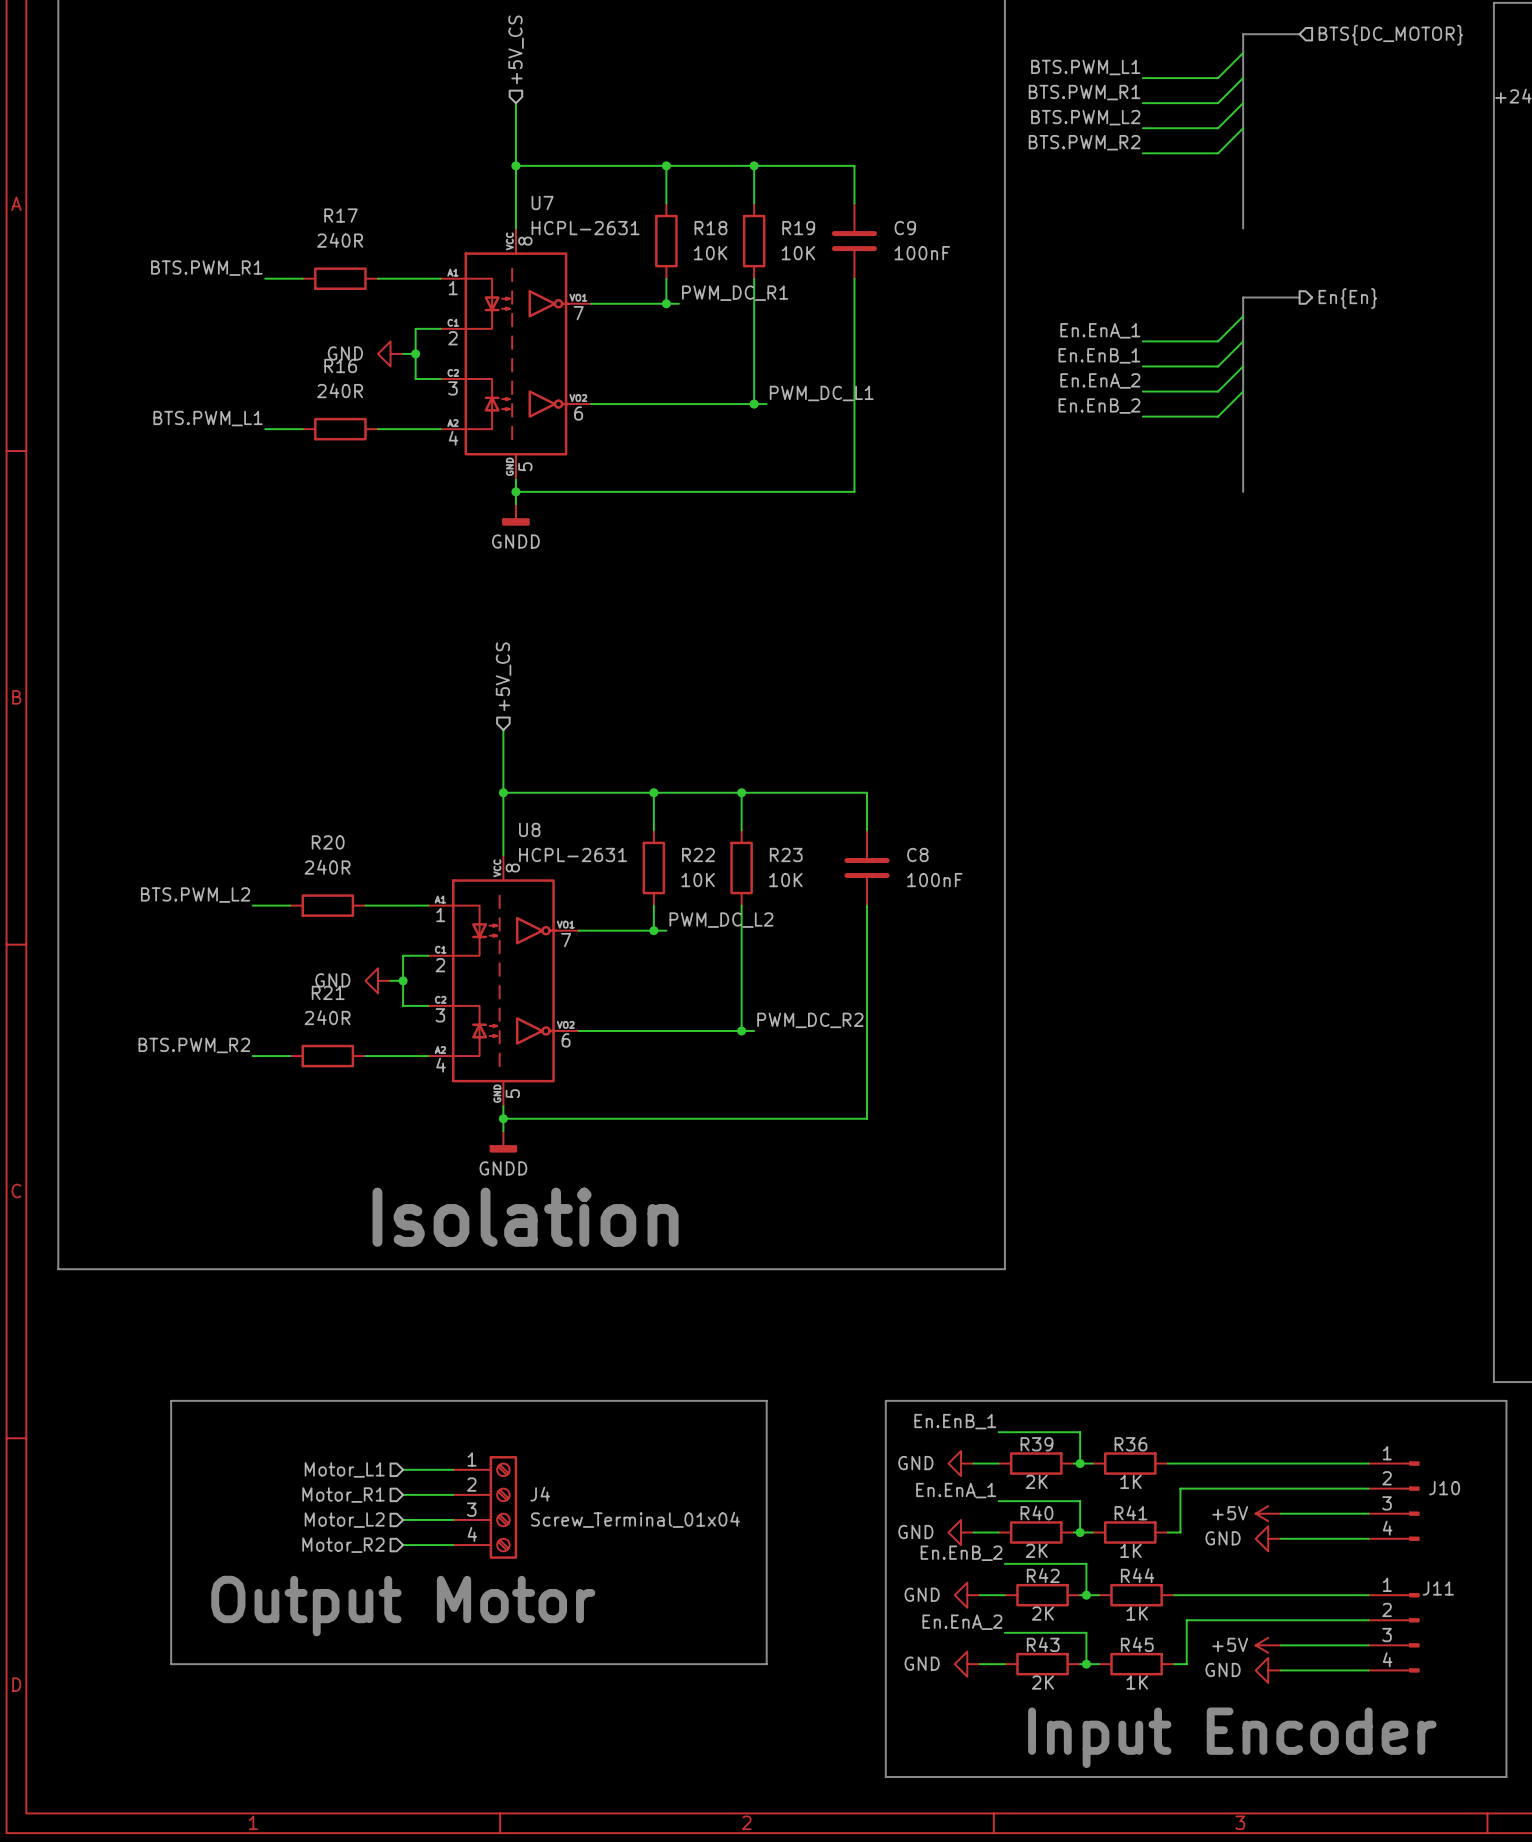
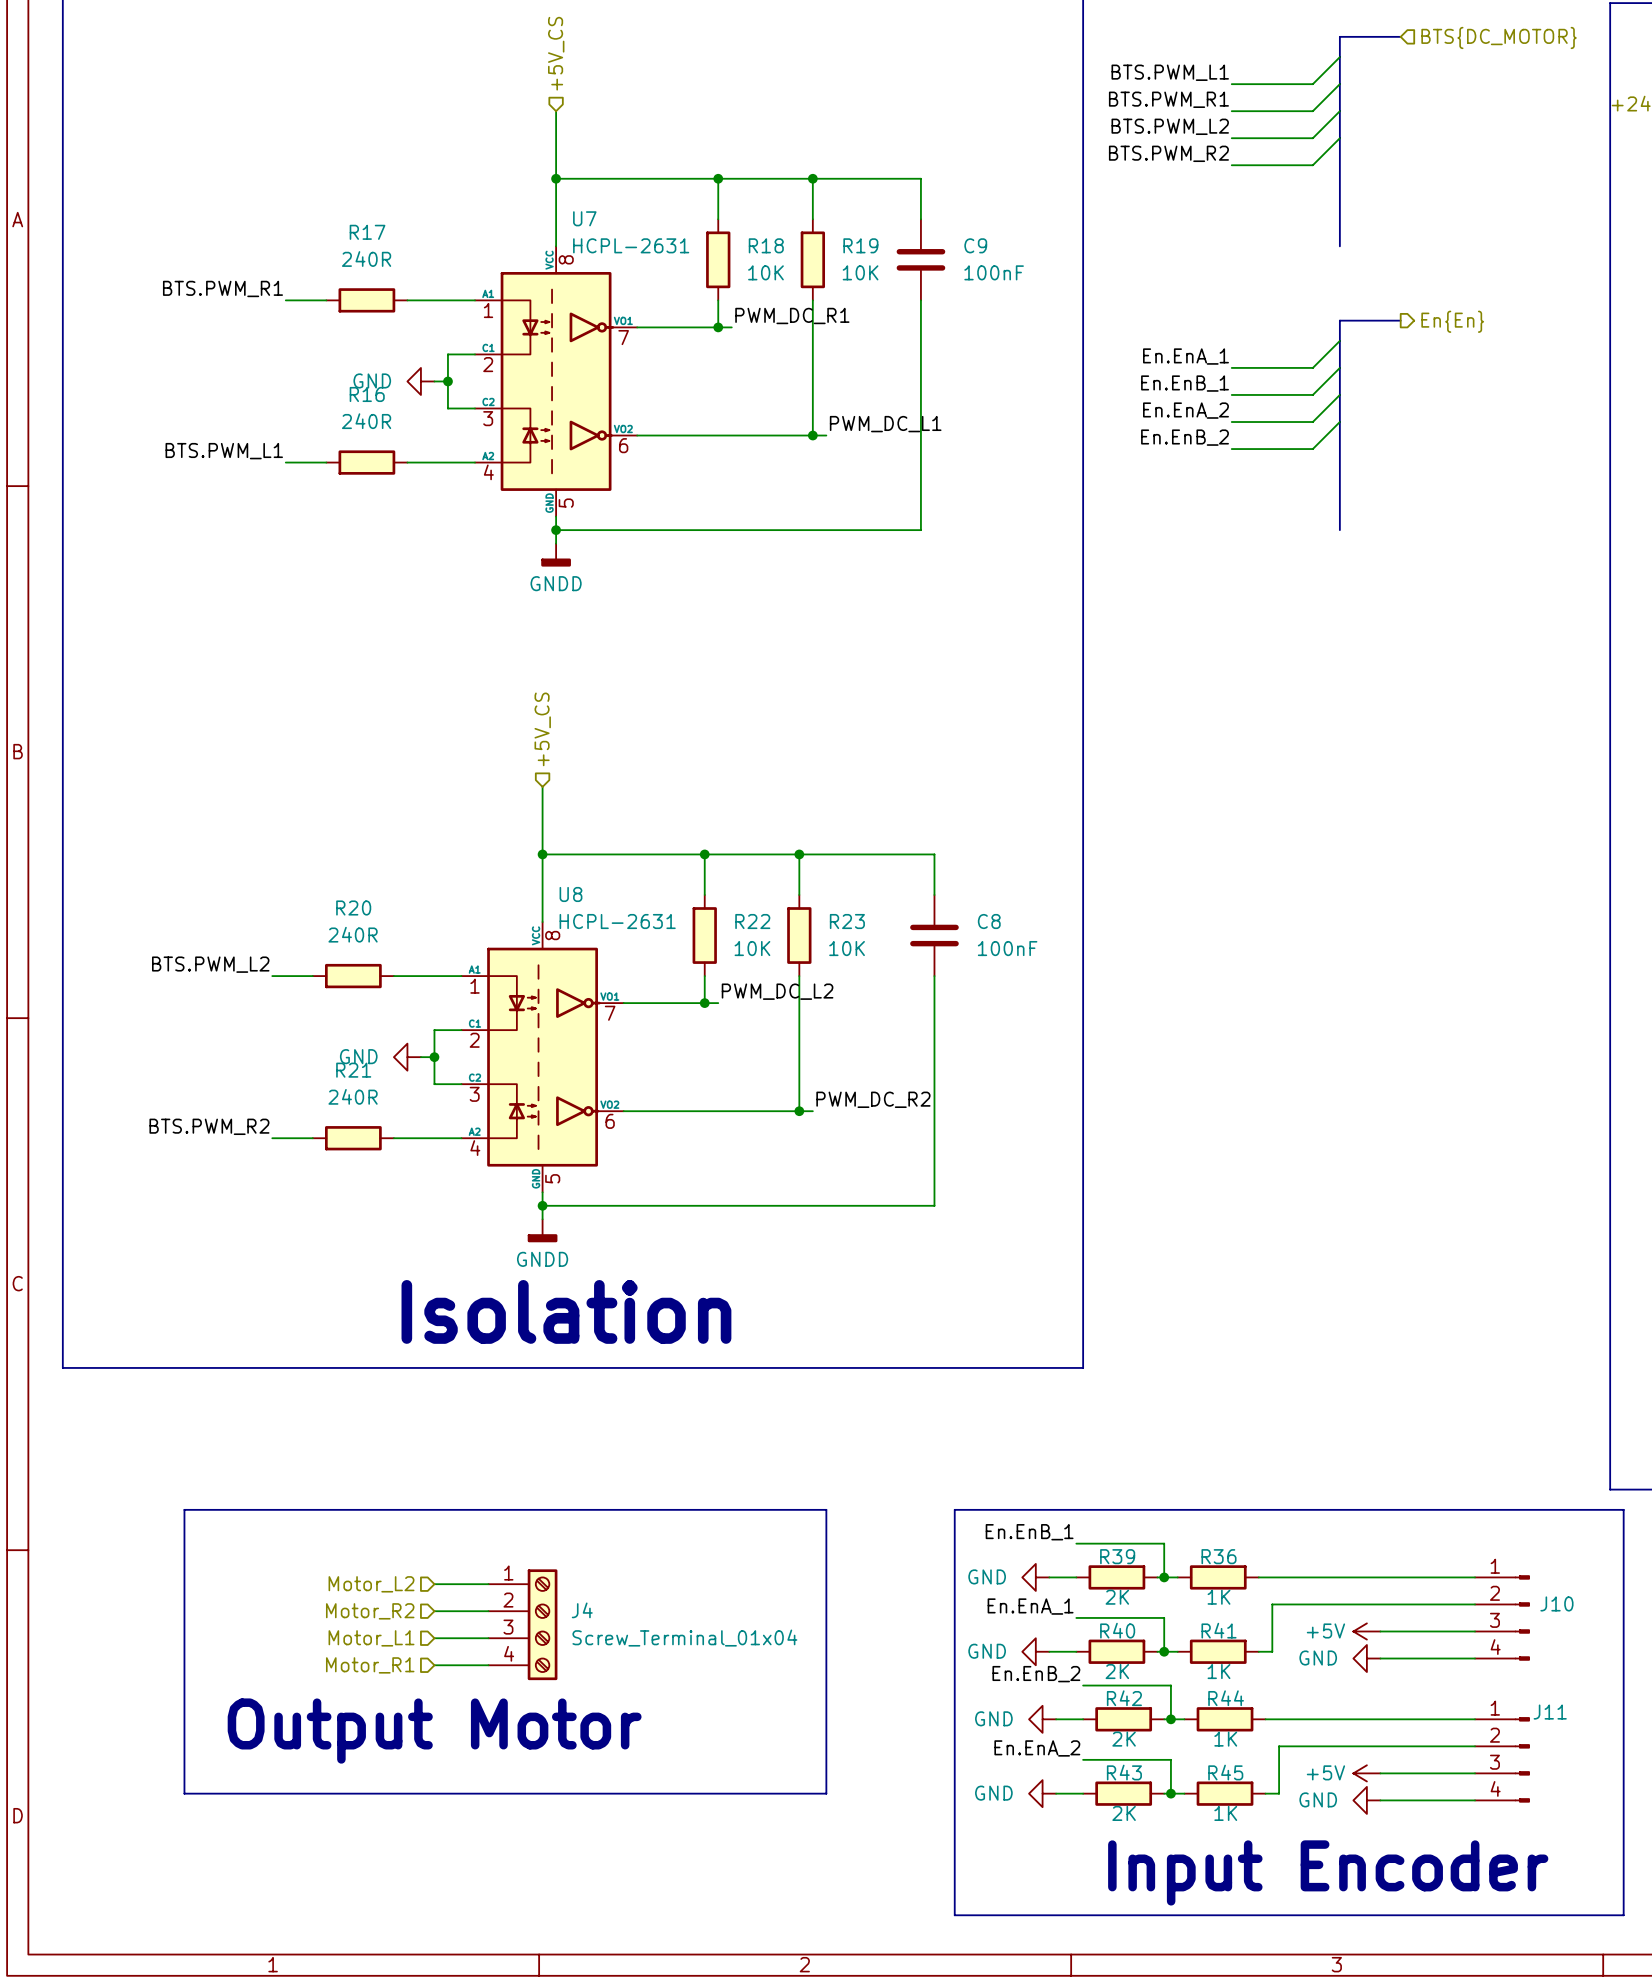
hierarchical label: Motor_L1 (344, 1469) -> Motor_L2 (371, 1584)
hierarchical label: Motor_R1 (343, 1495) -> Motor_R2 (370, 1611)
hierarchical label: Motor_L2 (344, 1520) -> Motor_L1 (371, 1638)
hierarchical label: Motor_R2 (343, 1545) -> Motor_R1 (370, 1665)

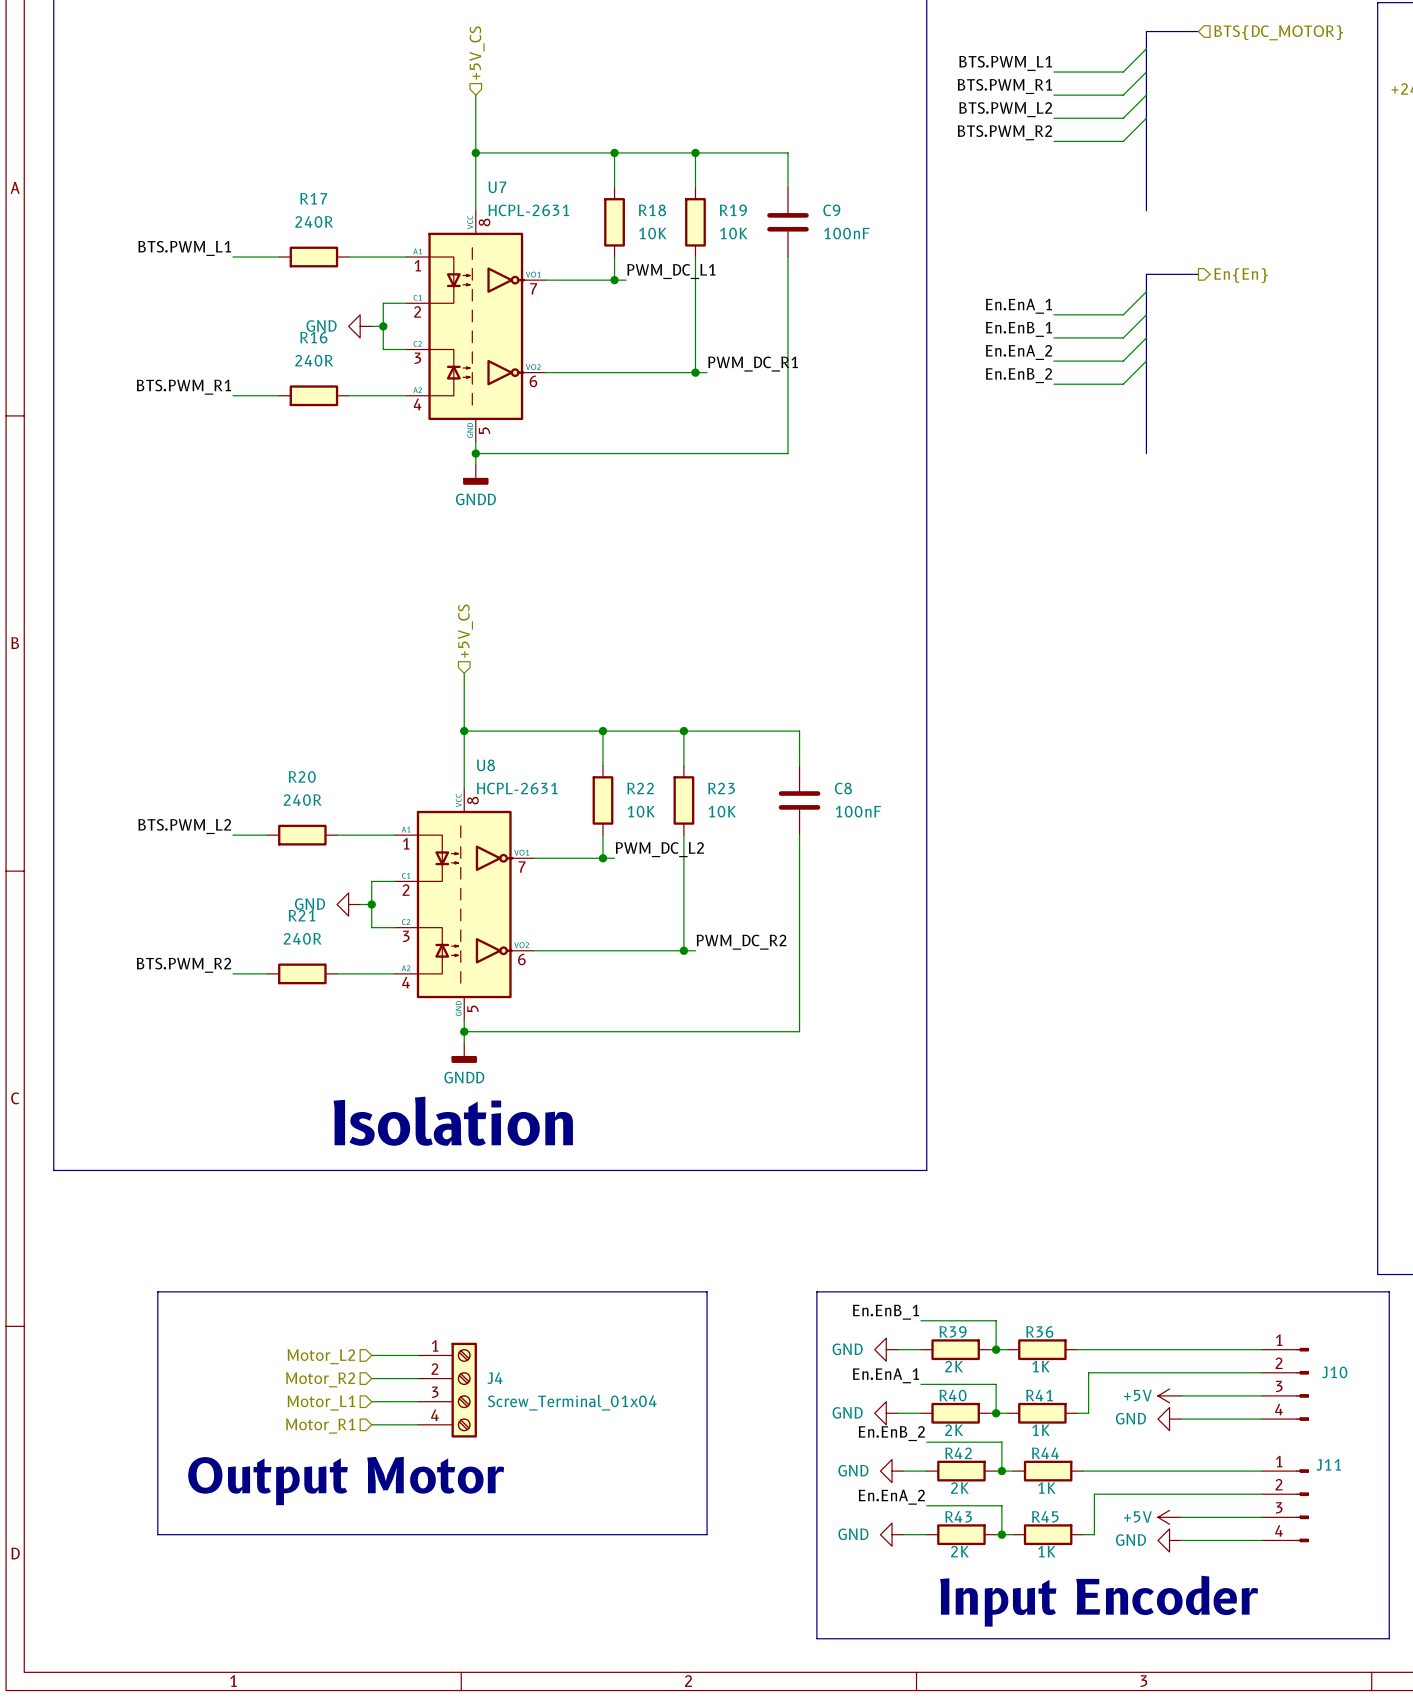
label position: BTS.PWM_R1 (222, 288) -> BTS.PWM_R1 (183, 387)
wire: none -> (232, 257) (244, 257)
label: PWM_DC_R1 (792, 315) -> PWM_DC_L1 (671, 271)
label: PWM_DC_L1 (885, 424) -> PWM_DC_R1 (753, 364)
label position: BTS.PWM_L1 (224, 451) -> BTS.PWM_L1 (184, 248)
wire: none -> (232, 395) (244, 395)

